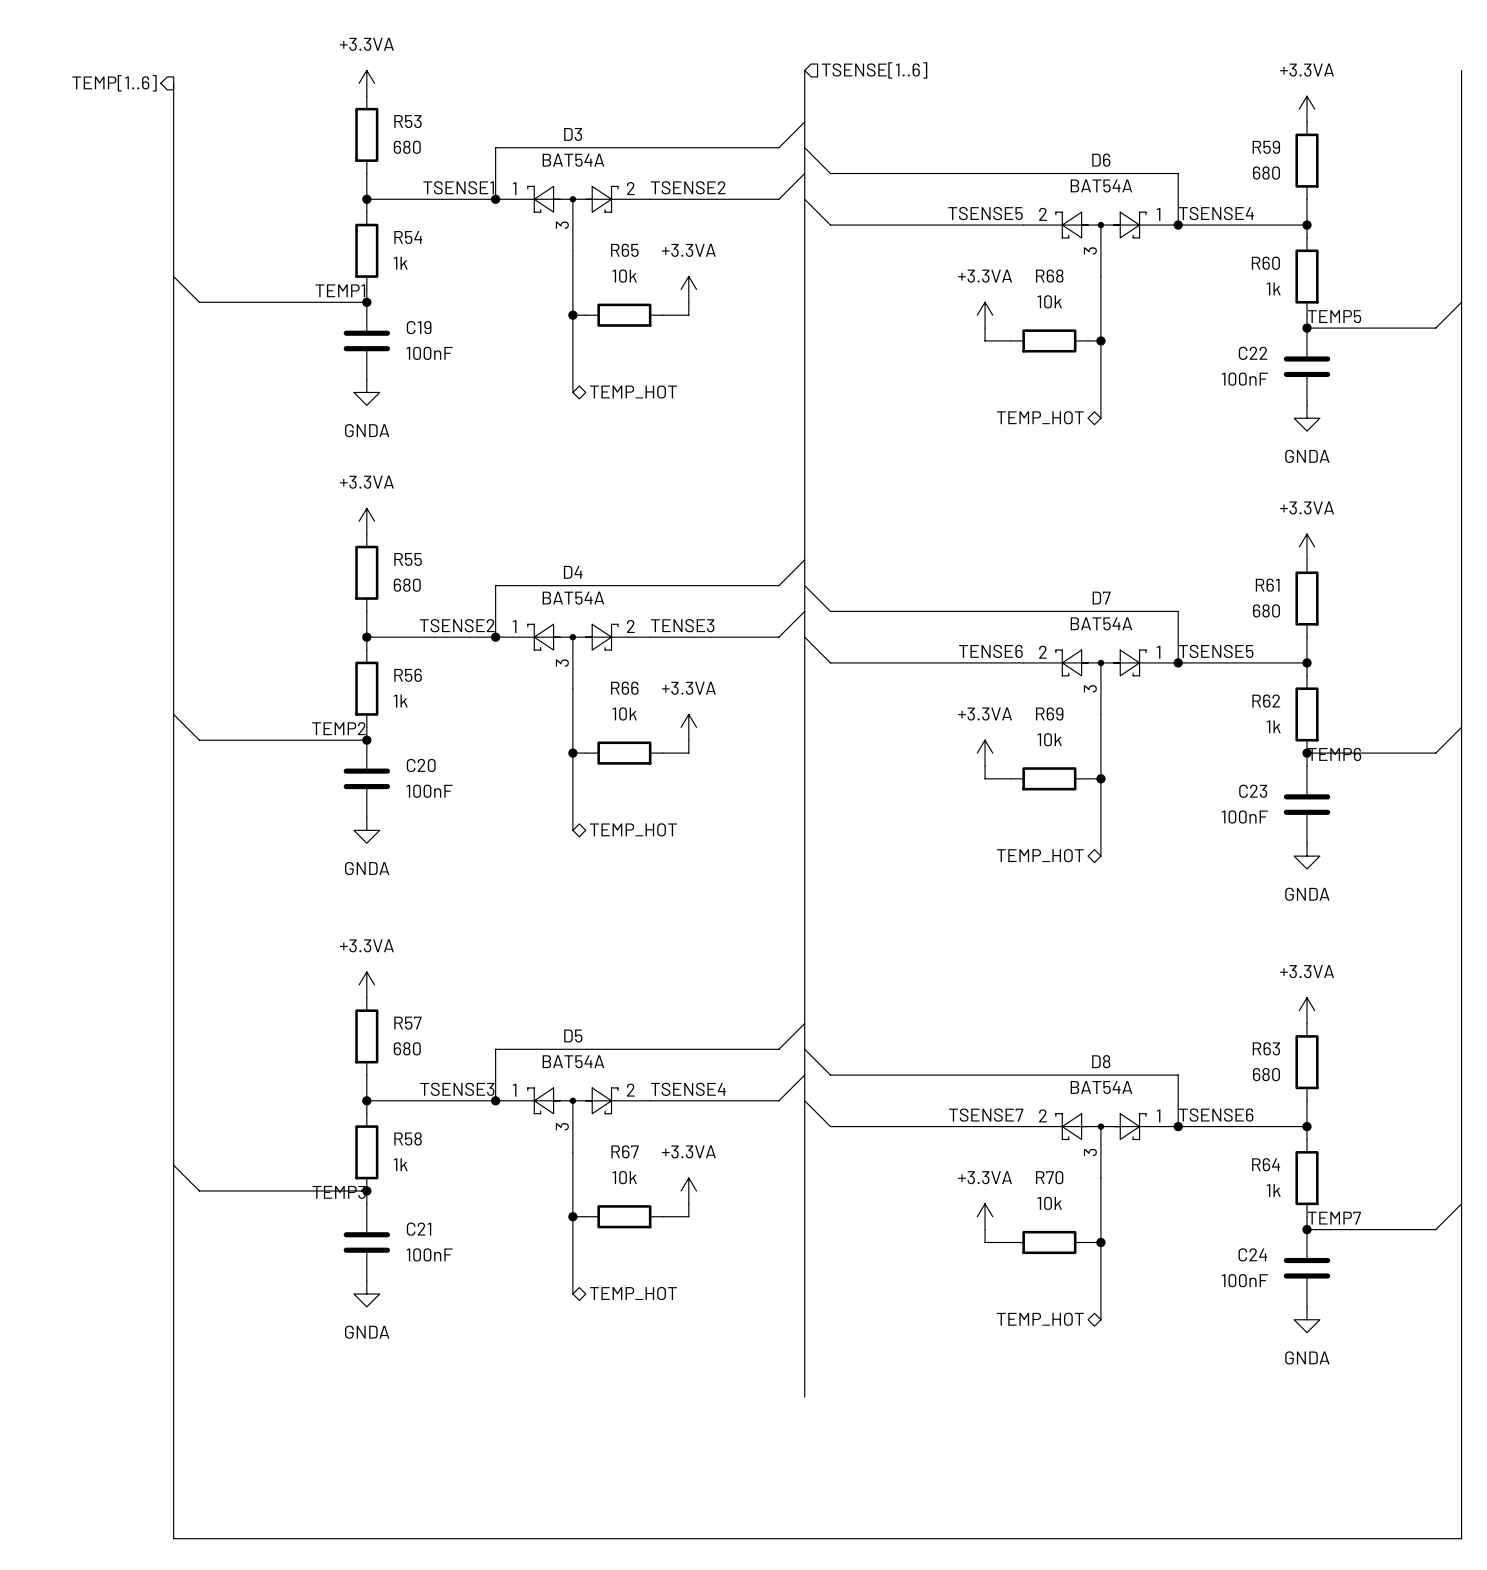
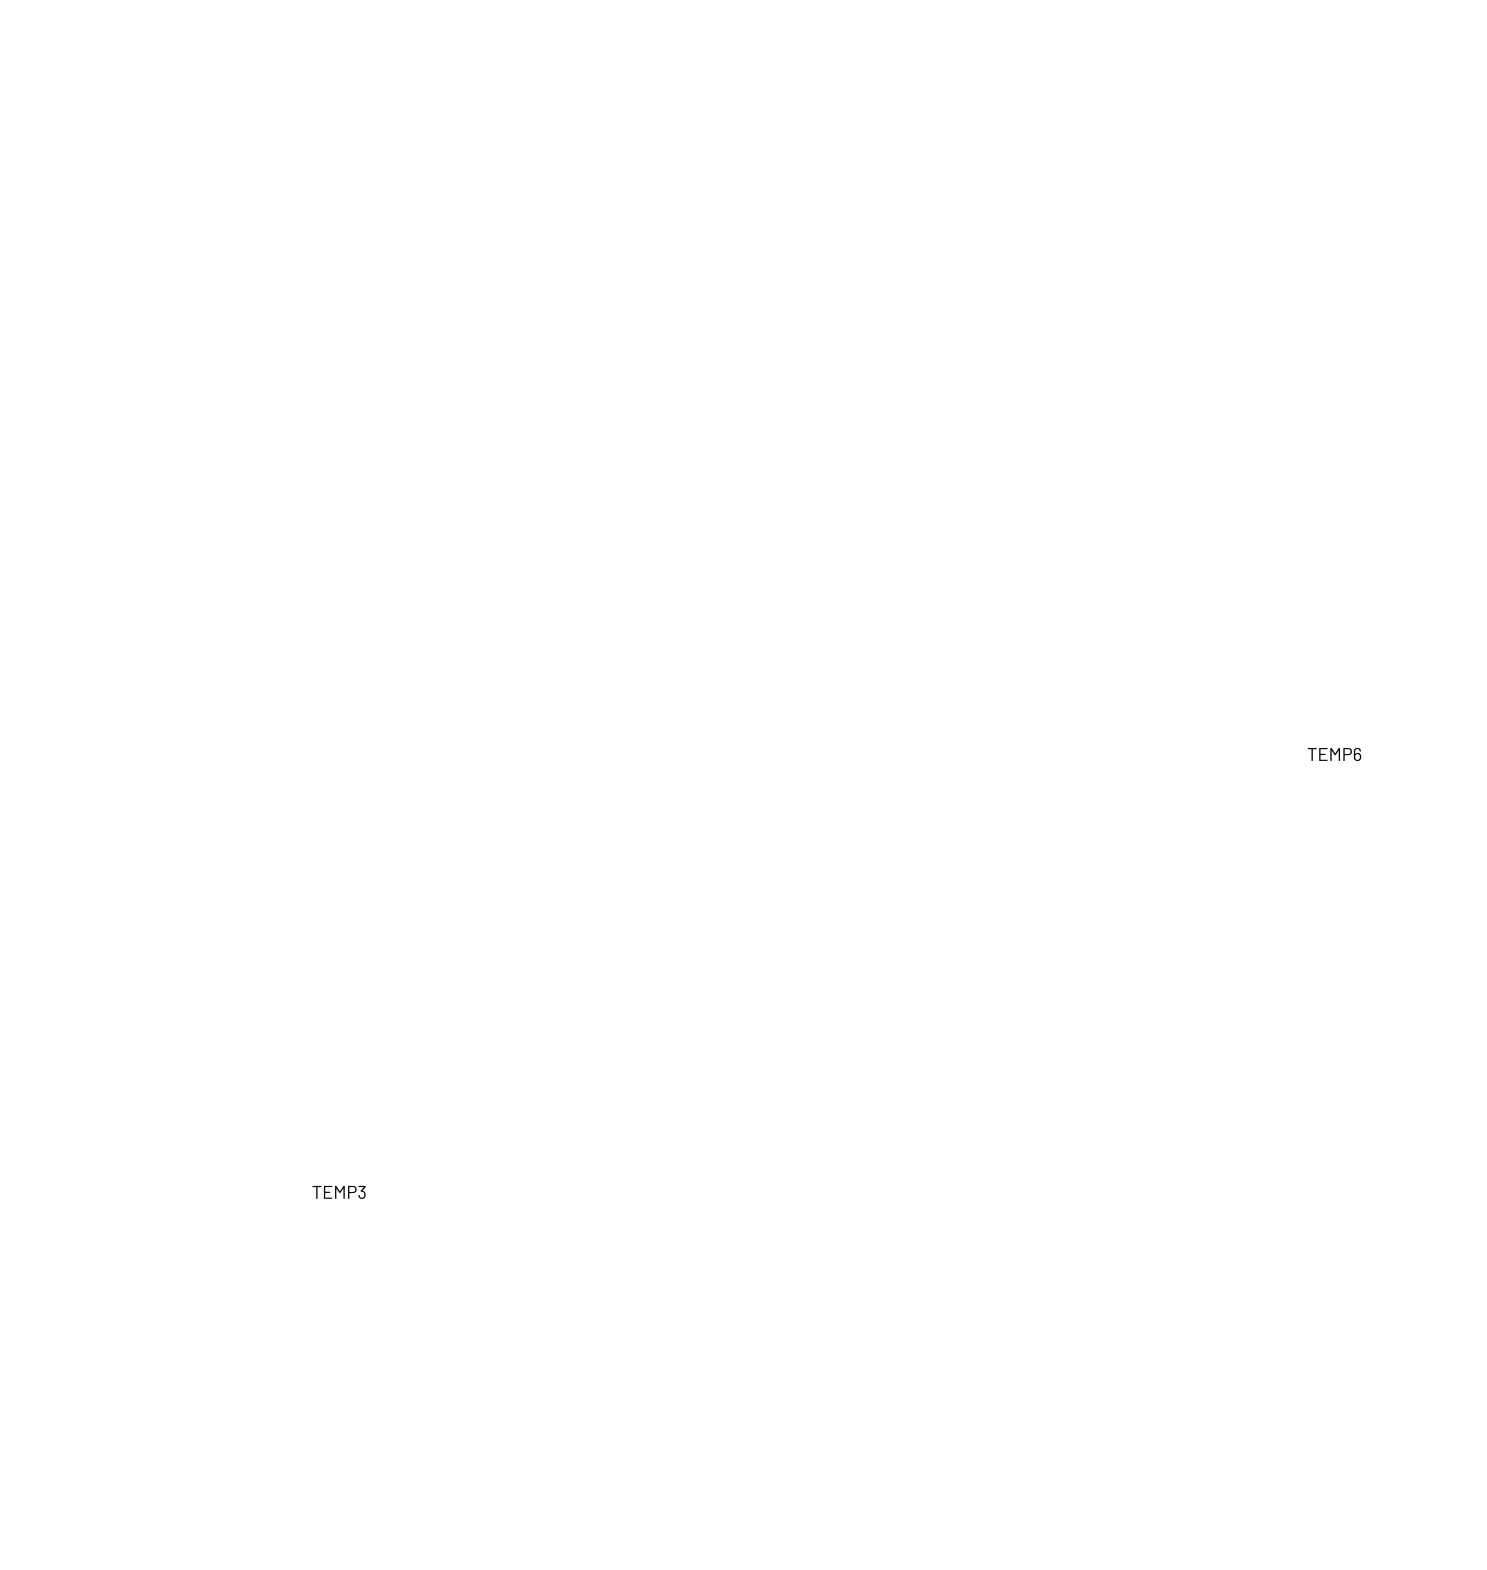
bus: (804, 70) (804, 1397) -> none
hierarchical label: TSENSE[1..6] (874, 70) -> none
bus: (1461, 70) (1461, 1538) (173, 1538) (173, 83) -> none
hierarchical label: TEMP[1..6] (114, 83) -> none
power symbol: +3.3VA (366, 83) -> none
power symbol: +3.3VA (1307, 109) -> none
wire: (804, 122) (778, 147) (495, 147) (495, 199) (366, 199) -> none
R53: 680 (366, 134) -> none
wire: (804, 147) (830, 173) (1178, 173) (1178, 225) (1307, 225) -> none
R59: 680 (1307, 160) -> none
wire: (366, 173) (366, 212) -> none
wire: (804, 173) (778, 199) (650, 199) -> none
label: TSENSE1 (458, 187) -> none
label: TSENSE2 (688, 187) -> none
junction: (366, 199) -> none
junction: (495, 199) -> none
wire: (804, 199) (830, 225) (1023, 225) -> none
wire: (1307, 199) (1307, 237) -> none
label: TSENSE5 (985, 213) -> none
label: TSENSE4 (1216, 213) -> none
D3: BAT54A (572, 218) -> none
junction: (1178, 225) -> none
junction: (1307, 225) -> none
D6: BAT54A (1100, 244) -> none
R54: 1k (366, 250) -> none
wire: (572, 250) (572, 392) -> none
wire: (173, 276) (199, 302) (366, 302) (366, 289) -> none
wire: (1100, 276) (1100, 418) -> none
R60: 1k (1307, 276) -> none
power symbol: +3.3VA (688, 289) -> none
label: TEMP1 (340, 290) -> none
junction: (366, 302) -> none
wire: (688, 302) (688, 315) (663, 315) -> none
wire: (1461, 302) (1435, 328) (1307, 328) (1307, 315) -> none
wire: (572, 315) (585, 315) -> none
junction: (572, 315) -> none
R65: 10k (624, 315) -> none
power symbol: +3.3VA (985, 315) -> none
label: TEMP5 (1334, 316) -> none
wire: (985, 328) (985, 340) (1010, 340) -> none
junction: (1307, 328) -> none
C19: 100nF (366, 340) -> none
R68: 10k (1049, 340) -> none
wire: (1088, 340) (1100, 340) -> none
junction: (1100, 340) -> none
C22: 100nF (1307, 366) -> none
hierarchical label: TEMP_HOT (633, 391) -> none
power symbol: GNDA (366, 392) -> none
hierarchical label: TEMP_HOT (1040, 417) -> none
power symbol: GNDA (1307, 418) -> none
power symbol: +3.3VA (366, 521) -> none
power symbol: +3.3VA (1307, 547) -> none
wire: (804, 559) (778, 585) (495, 585) (495, 637) (366, 637) -> none
R55: 680 (366, 572) -> none
wire: (804, 585) (830, 611) (1178, 611) (1178, 662) (1307, 662) -> none
R61: 680 (1307, 598) -> none
wire: (366, 611) (366, 650) -> none
wire: (804, 611) (778, 637) (650, 637) -> none
label: TSENSE2 (457, 625) -> none
label: TENSE3 (682, 625) -> none
junction: (366, 637) -> none
junction: (495, 637) -> none
wire: (804, 637) (830, 662) (1023, 662) -> none
wire: (1307, 637) (1307, 675) -> none
label: TENSE6 (990, 651) -> none
label: TSENSE5 (1216, 651) -> none
D4: BAT54A (572, 656) -> none
junction: (1178, 662) -> none
junction: (1307, 662) -> none
D7: BAT54A (1100, 682) -> none
R56: 1k (366, 688) -> none
wire: (572, 688) (572, 830) -> none
wire: (173, 714) (199, 740) (366, 740) (366, 727) -> none
wire: (1100, 714) (1100, 856) -> none
R62: 1k (1307, 714) -> none
power symbol: +3.3VA (688, 727) -> none
wire: (1461, 727) (1435, 753) (1307, 753) (1307, 765) -> none
label: TEMP2 (338, 728) -> none
junction: (366, 740) -> none
wire: (688, 740) (688, 753) (663, 753) -> none
wire: (572, 753) (585, 753) -> none
junction: (572, 753) -> none
R66: 10k (624, 753) -> none
power symbol: +3.3VA (985, 753) -> none
junction: (1307, 753) -> none
wire: (985, 765) (985, 778) (1010, 778) -> none
C20: 100nF (366, 778) -> none
R69: 10k (1049, 778) -> none
wire: (1088, 778) (1100, 778) -> none
junction: (1100, 778) -> none
C23: 100nF (1307, 804) -> none
hierarchical label: TEMP_HOT (633, 829) -> none
power symbol: GNDA (366, 830) -> none
hierarchical label: TEMP_HOT (1040, 855) -> none
power symbol: GNDA (1307, 856) -> none
power symbol: +3.3VA (366, 984) -> none
power symbol: +3.3VA (1307, 1010) -> none
wire: (804, 1023) (778, 1049) (495, 1049) (495, 1100) (366, 1100) -> none
R57: 680 (366, 1036) -> none
wire: (804, 1049) (830, 1075) (1178, 1075) (1178, 1126) (1307, 1126) -> none
R63: 680 (1307, 1062) -> none
wire: (366, 1075) (366, 1113) -> none
wire: (804, 1075) (778, 1100) (650, 1100) -> none
label: TSENSE3 (457, 1089) -> none
label: TSENSE4 (688, 1089) -> none
junction: (366, 1100) -> none
junction: (495, 1100) -> none
wire: (804, 1100) (830, 1126) (1023, 1126) -> none
wire: (1307, 1100) (1307, 1139) -> none
label: TSENSE7 (986, 1115) -> none
label: TSENSE6 (1216, 1115) -> none
D5: BAT54A (572, 1120) -> none
junction: (1178, 1126) -> none
junction: (1307, 1126) -> none
D8: BAT54A (1100, 1145) -> none
R58: 1k (366, 1152) -> none
wire: (572, 1152) (572, 1294) -> none
wire: (173, 1165) (199, 1190) (366, 1190) (366, 1203) -> none
wire: (1100, 1178) (1100, 1319) -> none
R64: 1k (1307, 1178) -> none
junction: (366, 1190) -> none
power symbol: +3.3VA (688, 1190) -> none
wire: (688, 1203) (688, 1216) (663, 1216) -> none
wire: (1461, 1203) (1435, 1229) (1307, 1229) (1307, 1216) -> none
wire: (572, 1216) (585, 1216) -> none
junction: (572, 1216) -> none
R67: 10k (624, 1216) -> none
power symbol: +3.3VA (985, 1216) -> none
label: TEMP7 (1334, 1218) -> none
wire: (985, 1229) (985, 1242) (1010, 1242) -> none
junction: (1307, 1229) -> none
C21: 100nF (366, 1242) -> none
R70: 10k (1049, 1242) -> none
wire: (1088, 1242) (1100, 1242) -> none
junction: (1100, 1242) -> none
C24: 100nF (1307, 1268) -> none
hierarchical label: TEMP_HOT (633, 1293) -> none
power symbol: GNDA (366, 1294) -> none
hierarchical label: TEMP_HOT (1040, 1319) -> none
power symbol: GNDA (1307, 1319) -> none

